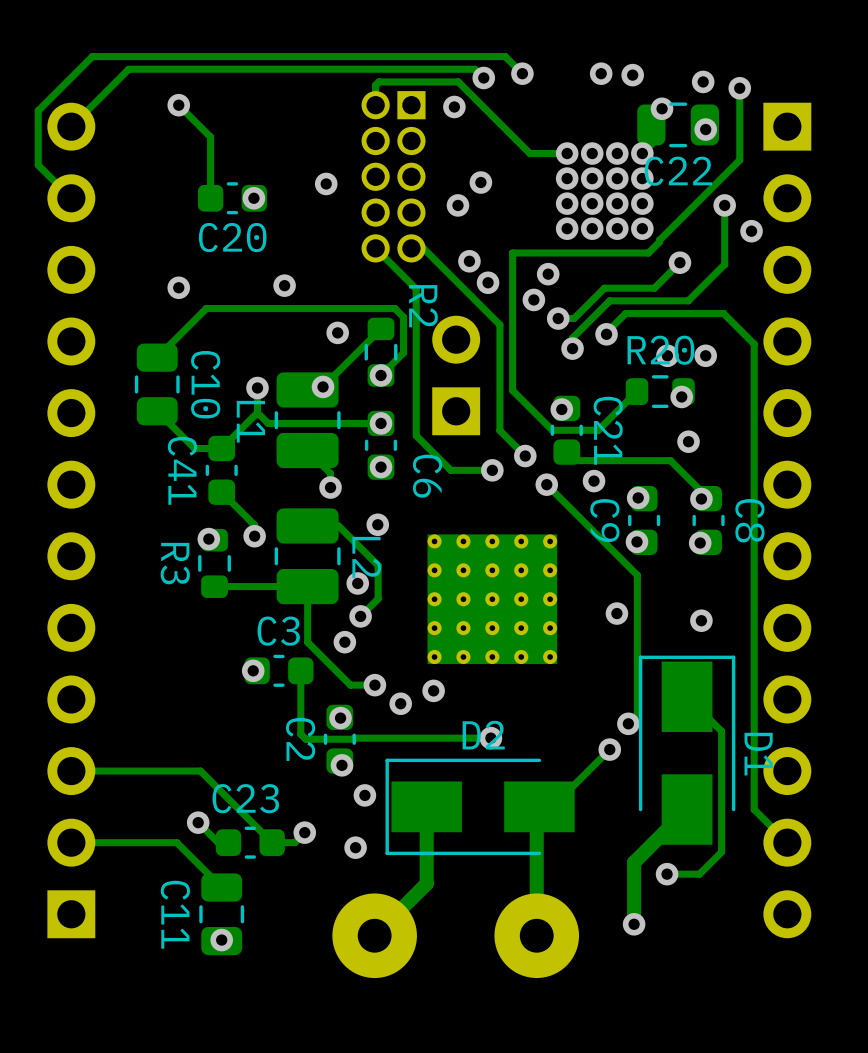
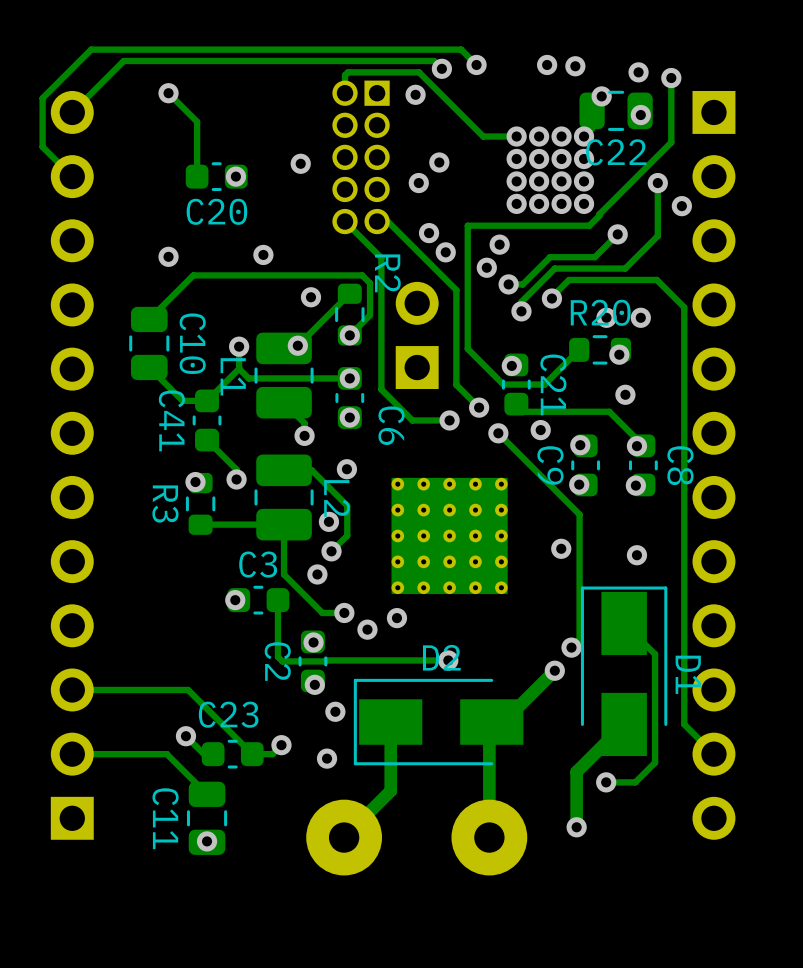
track width: thin (609, 749) (552, 806) -> thick (554, 670) (503, 722)

